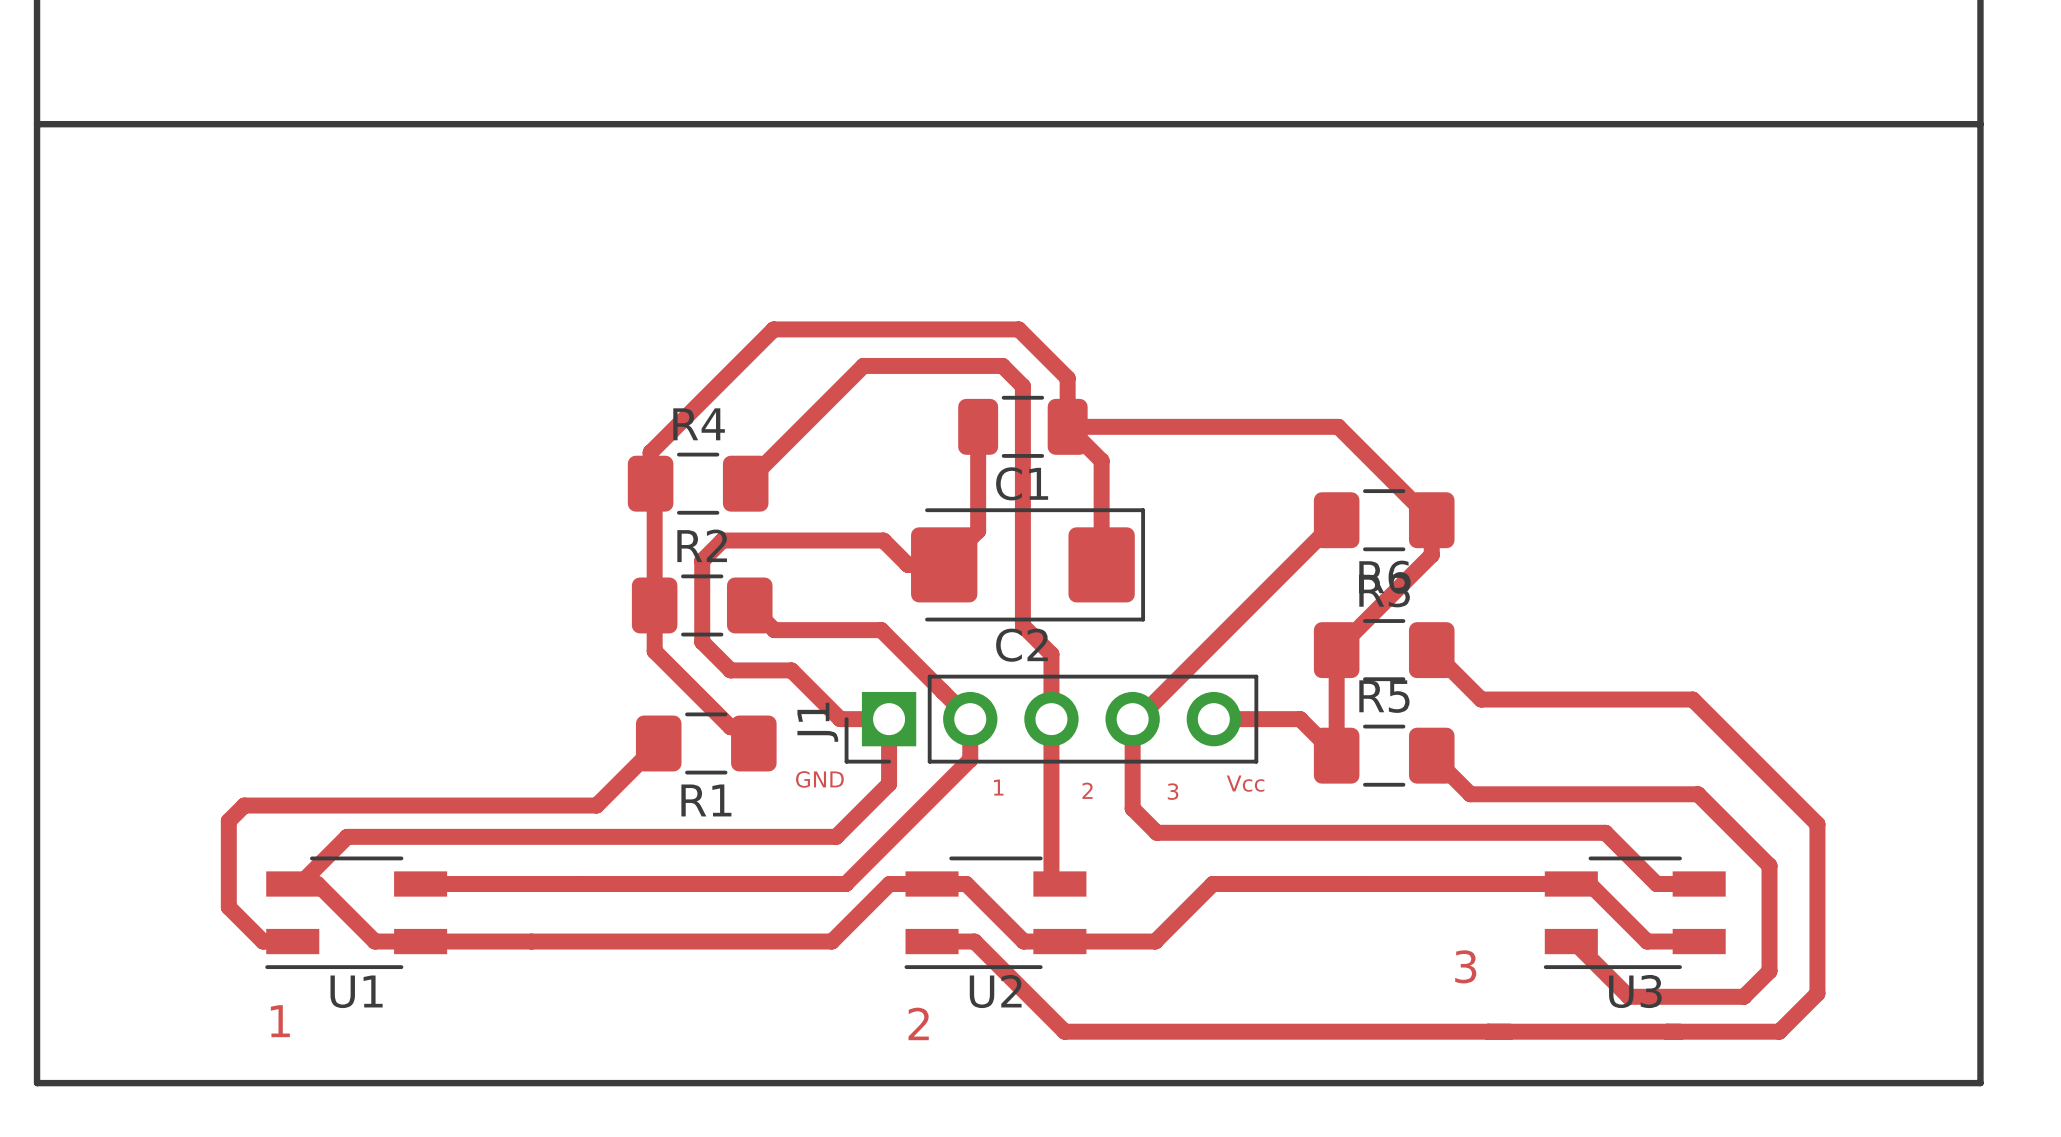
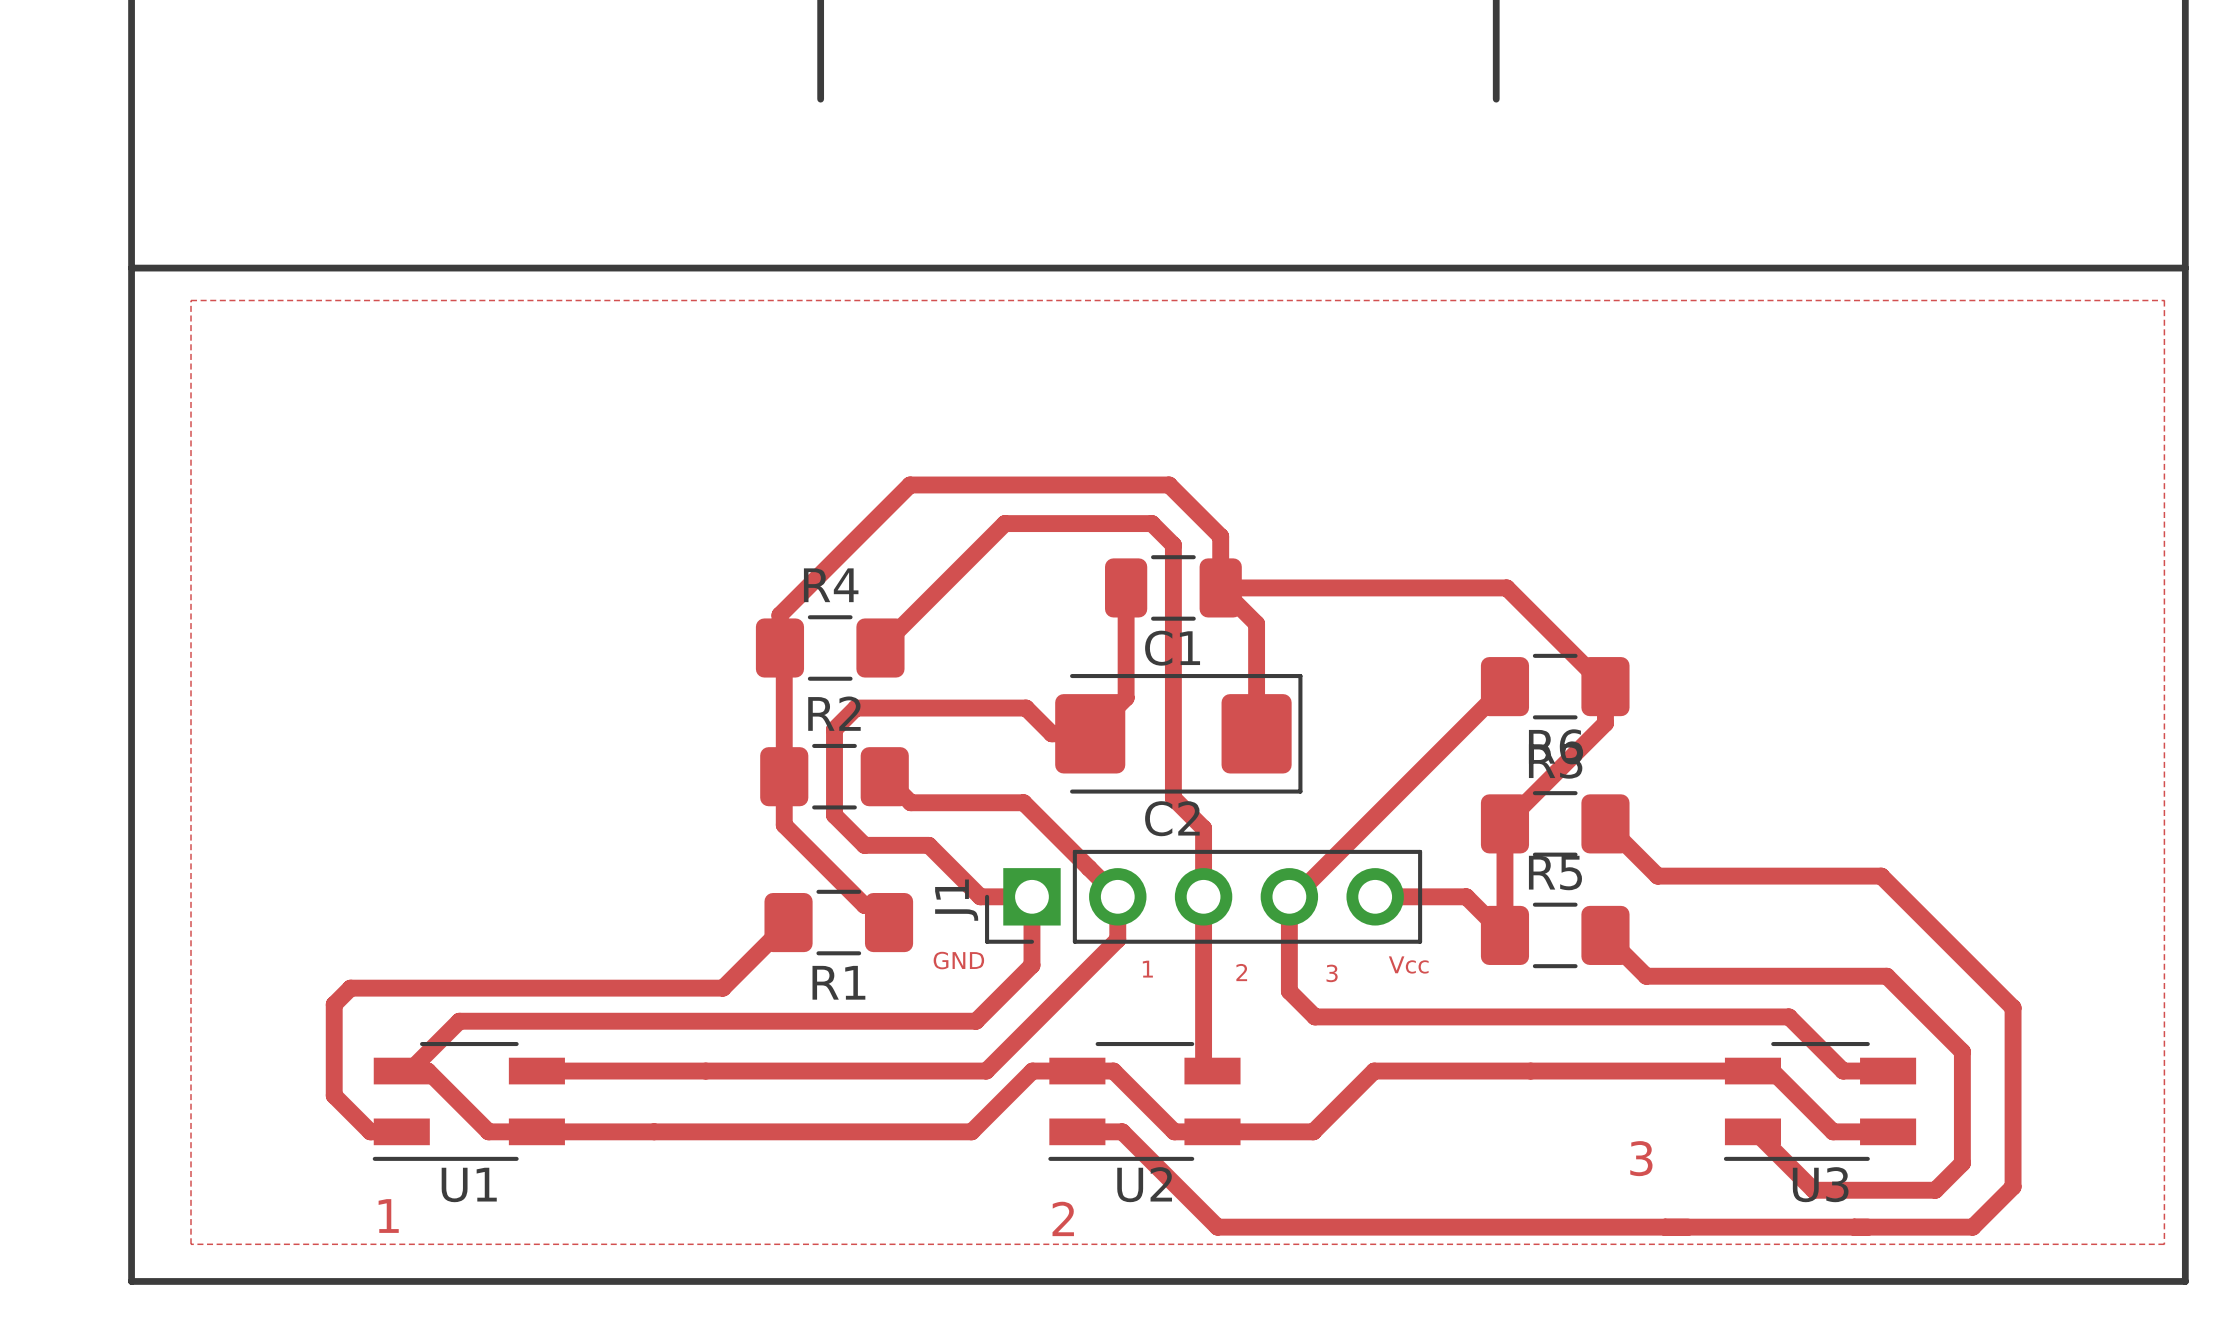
top zone outline: none -> (191, 300) (2164, 300) (2164, 1244) (191, 1244) (191, 300)

